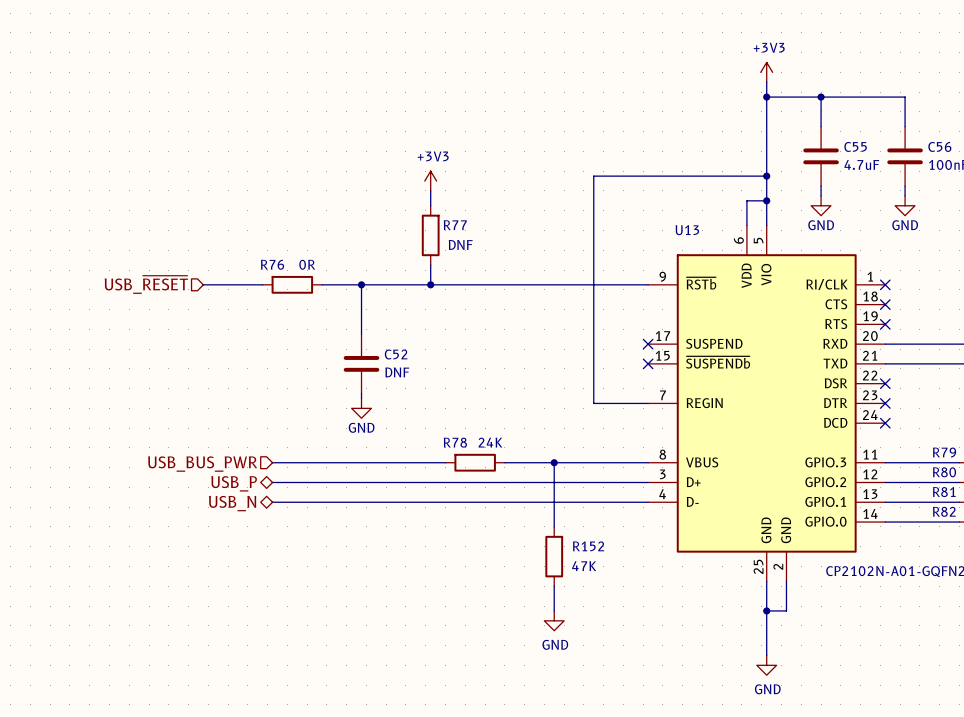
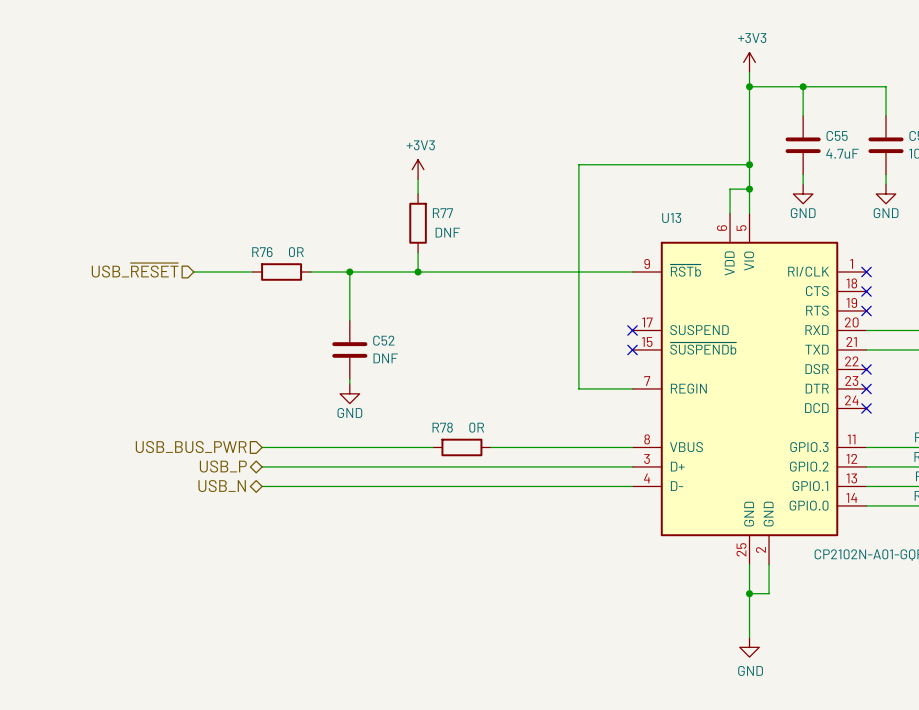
R78 value: 24K (490, 442) -> 0R (476, 427)
wire: (554, 462) (554, 526) -> none
junction: (554, 462) -> none
R152: 47K (554, 556) -> none
wire: (554, 586) (554, 610) -> none
power symbol: GND (554, 620) -> none

